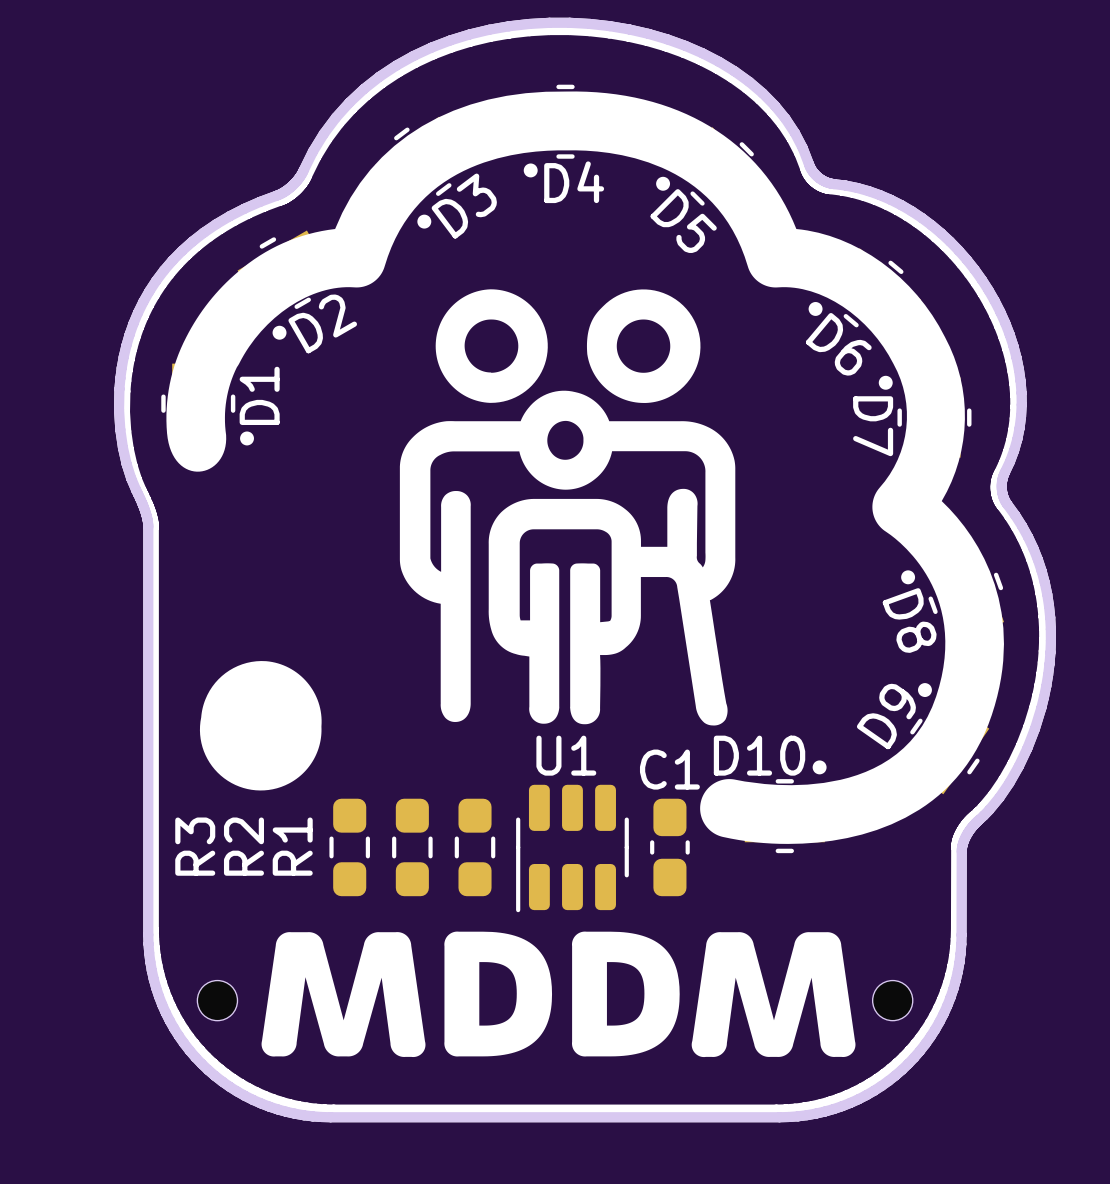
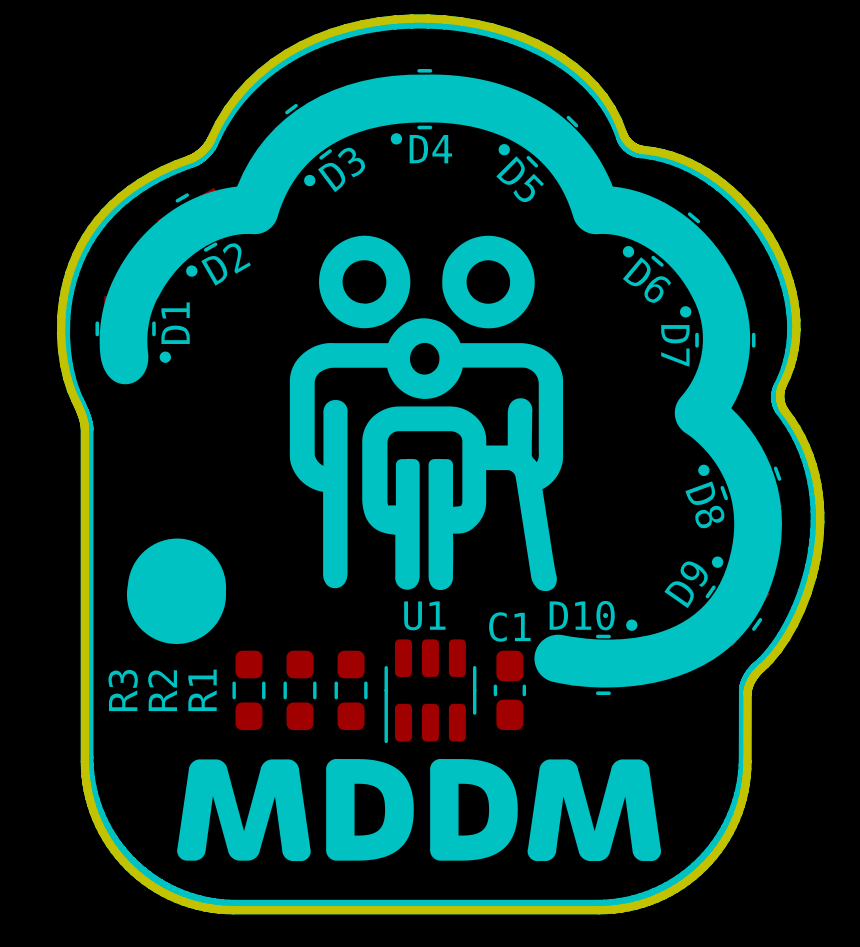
part: (217, 1000) -> none
part: (892, 1000) -> none

